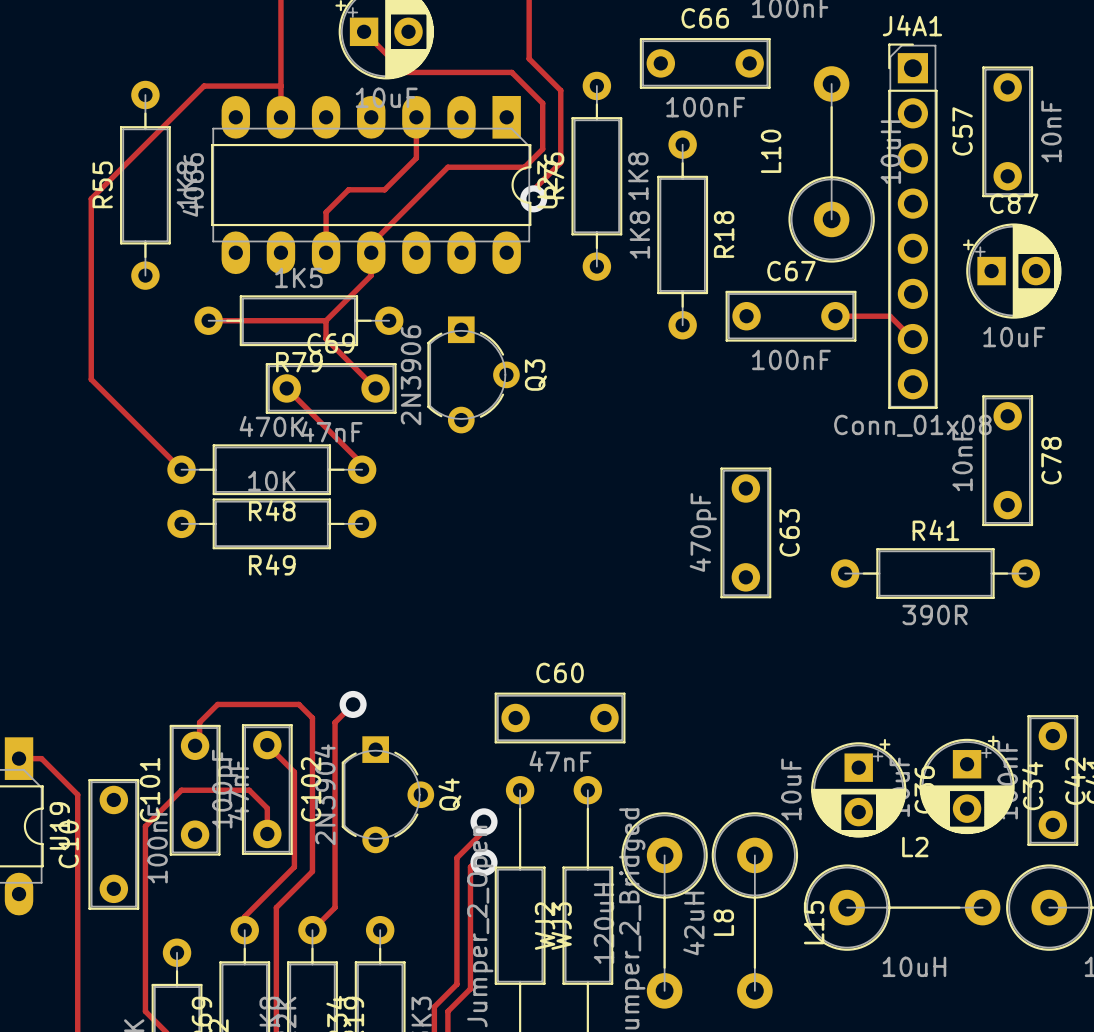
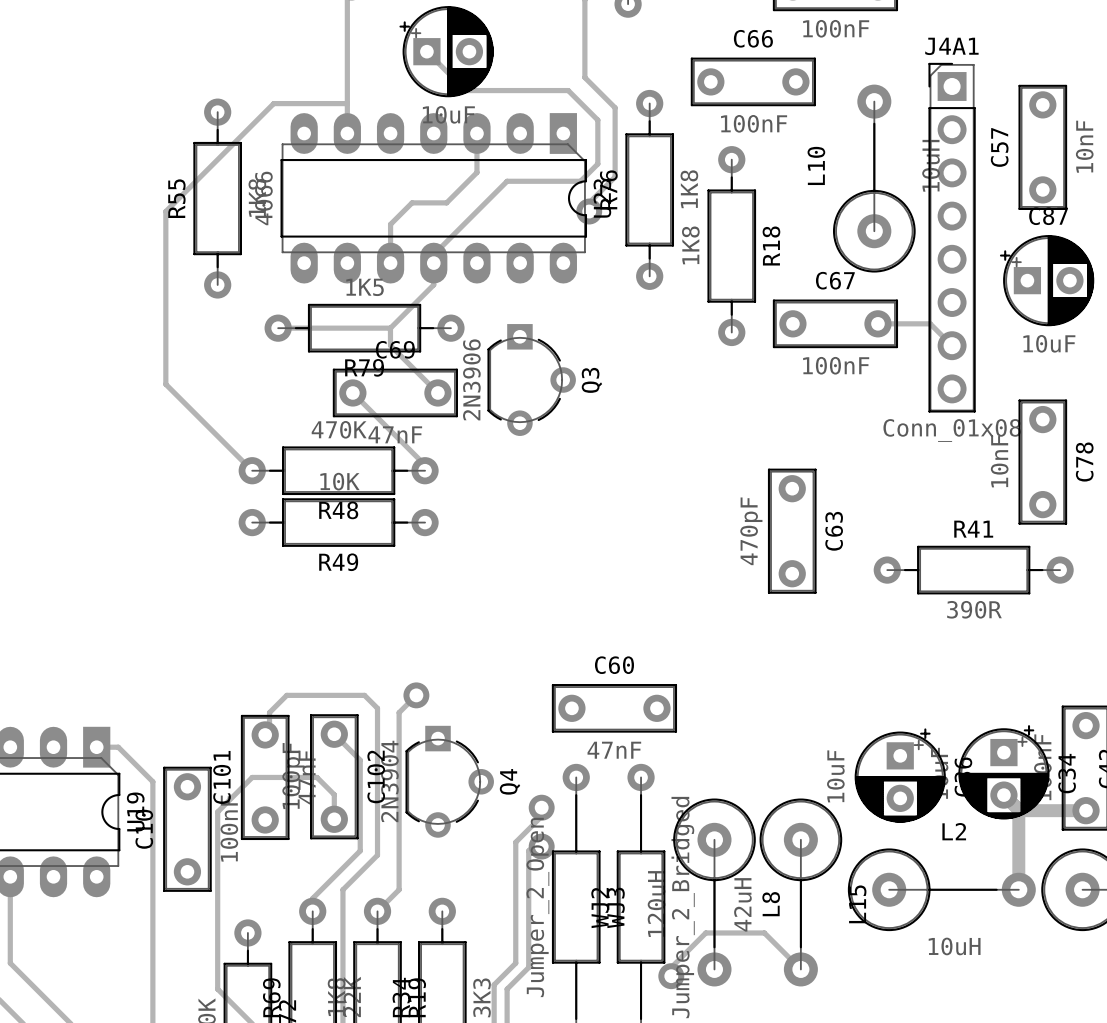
track: none -> (1003, 795) (1019, 810) (1086, 810)
track: none -> (1018, 809) (1018, 889)
track: none -> (800, 969) (764, 932) (705, 932) (671, 967) (671, 976)
via: none -> (671, 976)

